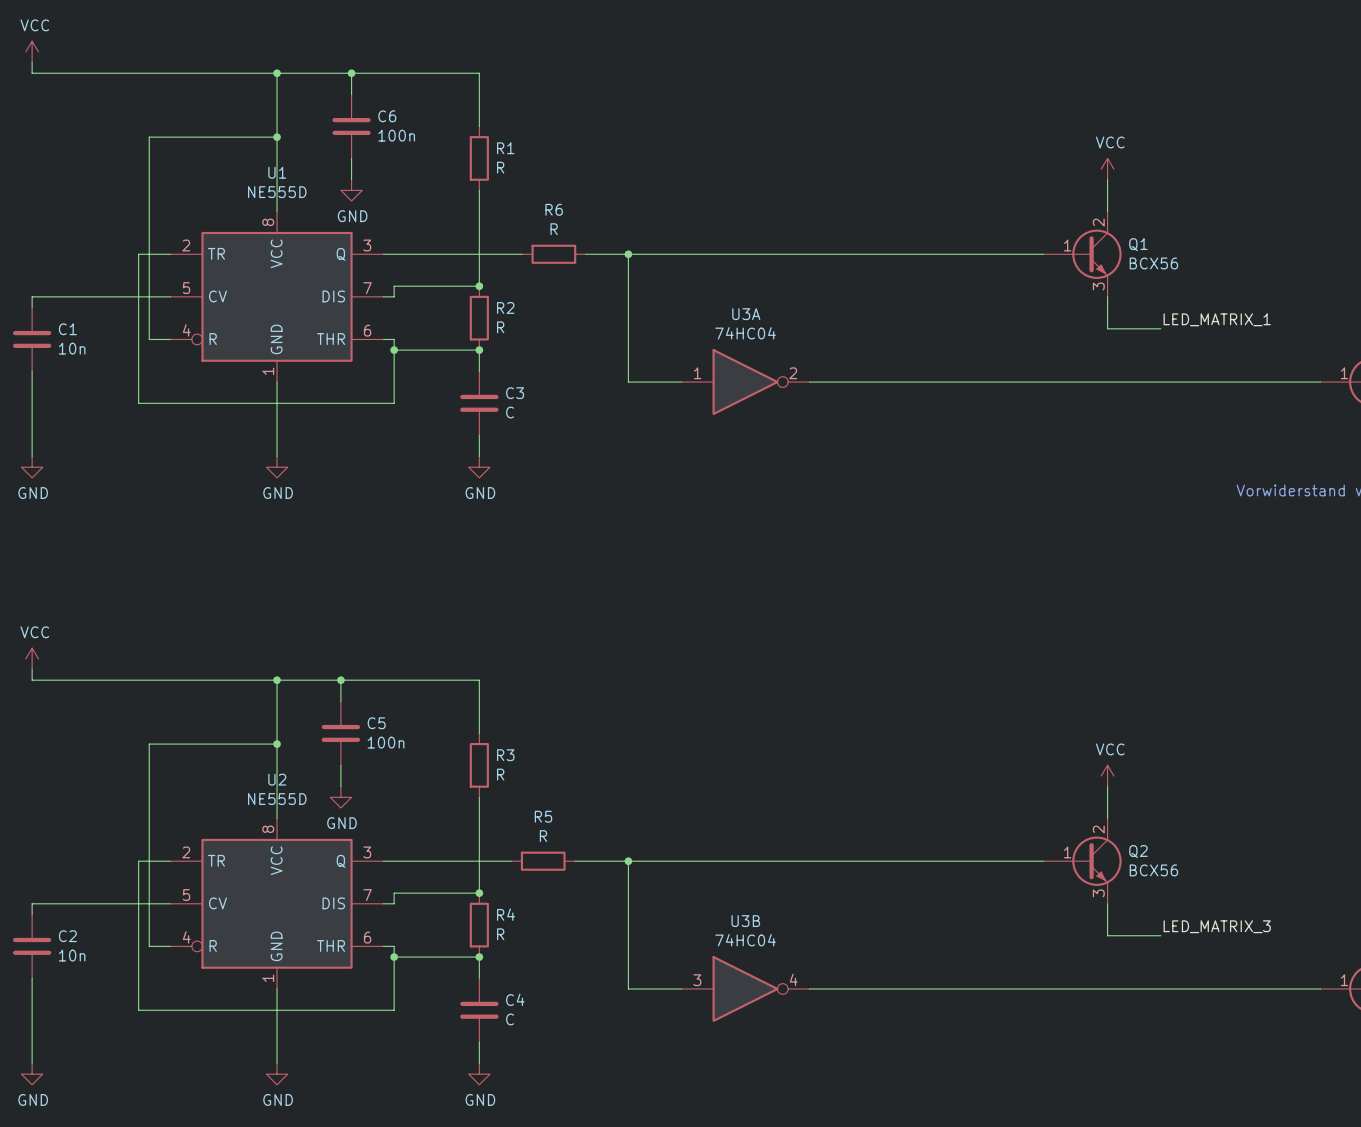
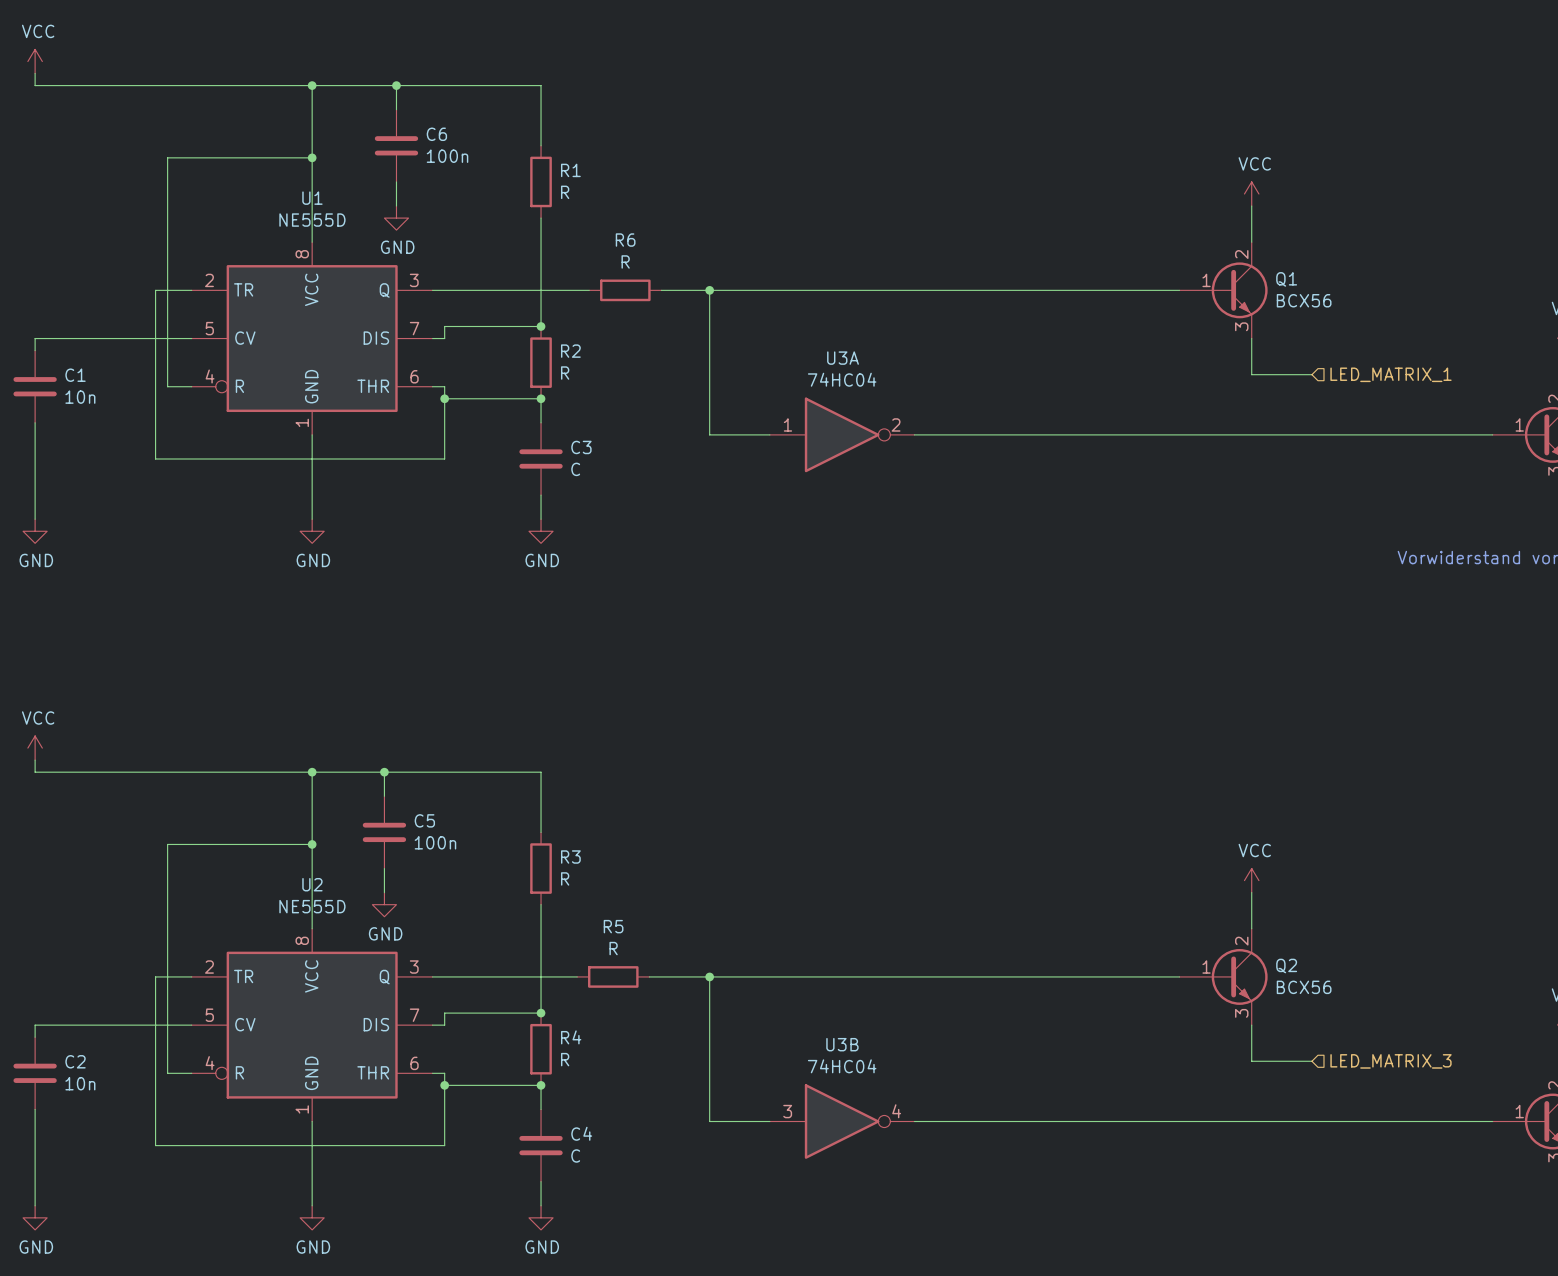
label: LED_MATRIX_1 (1217, 319) -> none
hierarchical label: none -> LED_MATRIX_1 (1391, 374)
label: LED_MATRIX_3 (1217, 926) -> none
hierarchical label: none -> LED_MATRIX_3 (1391, 1061)

